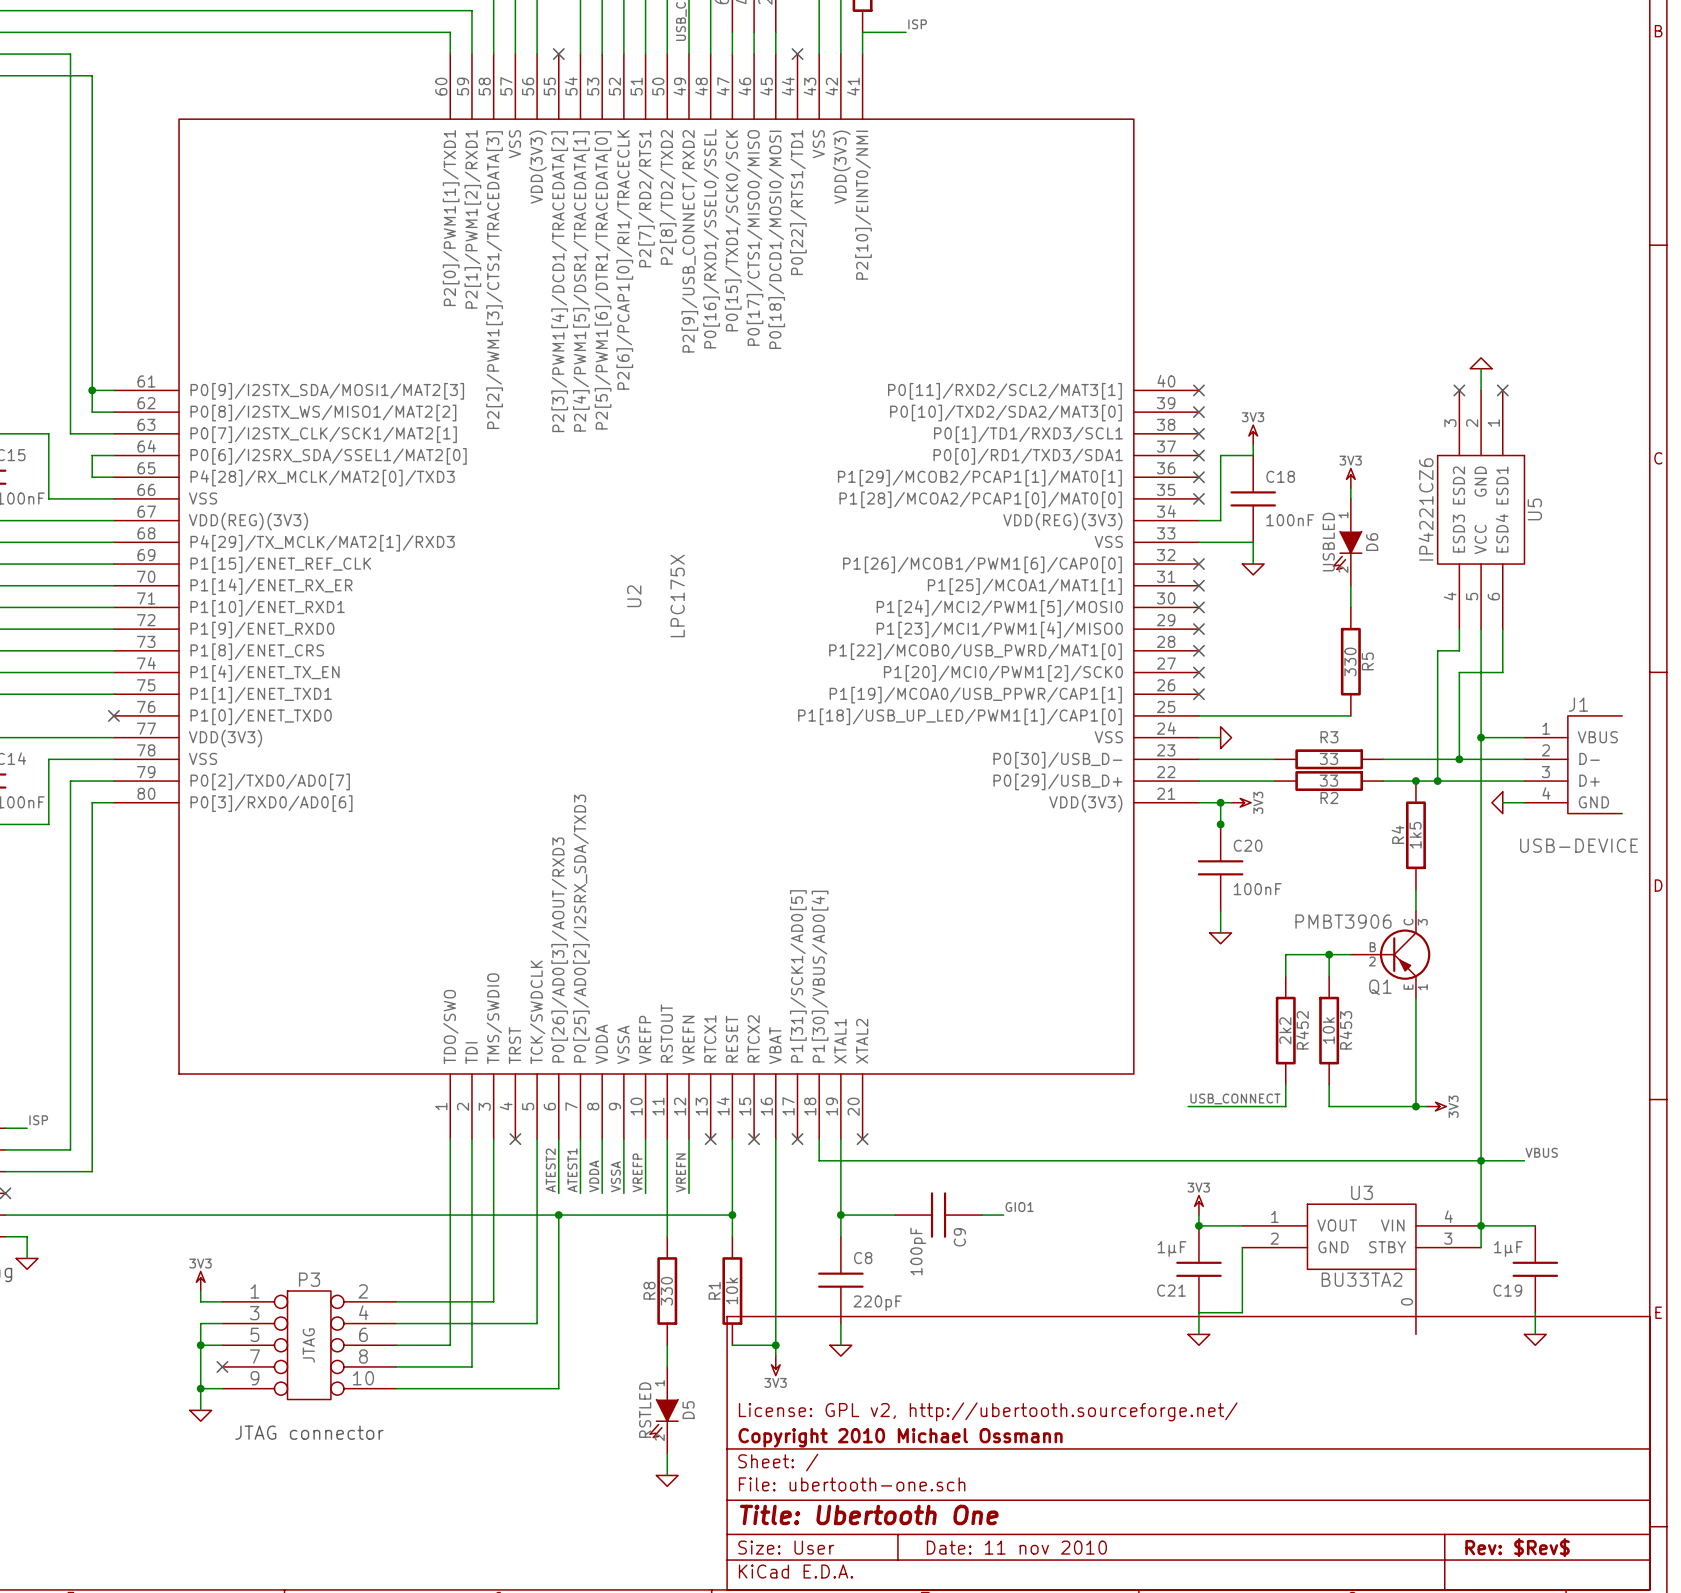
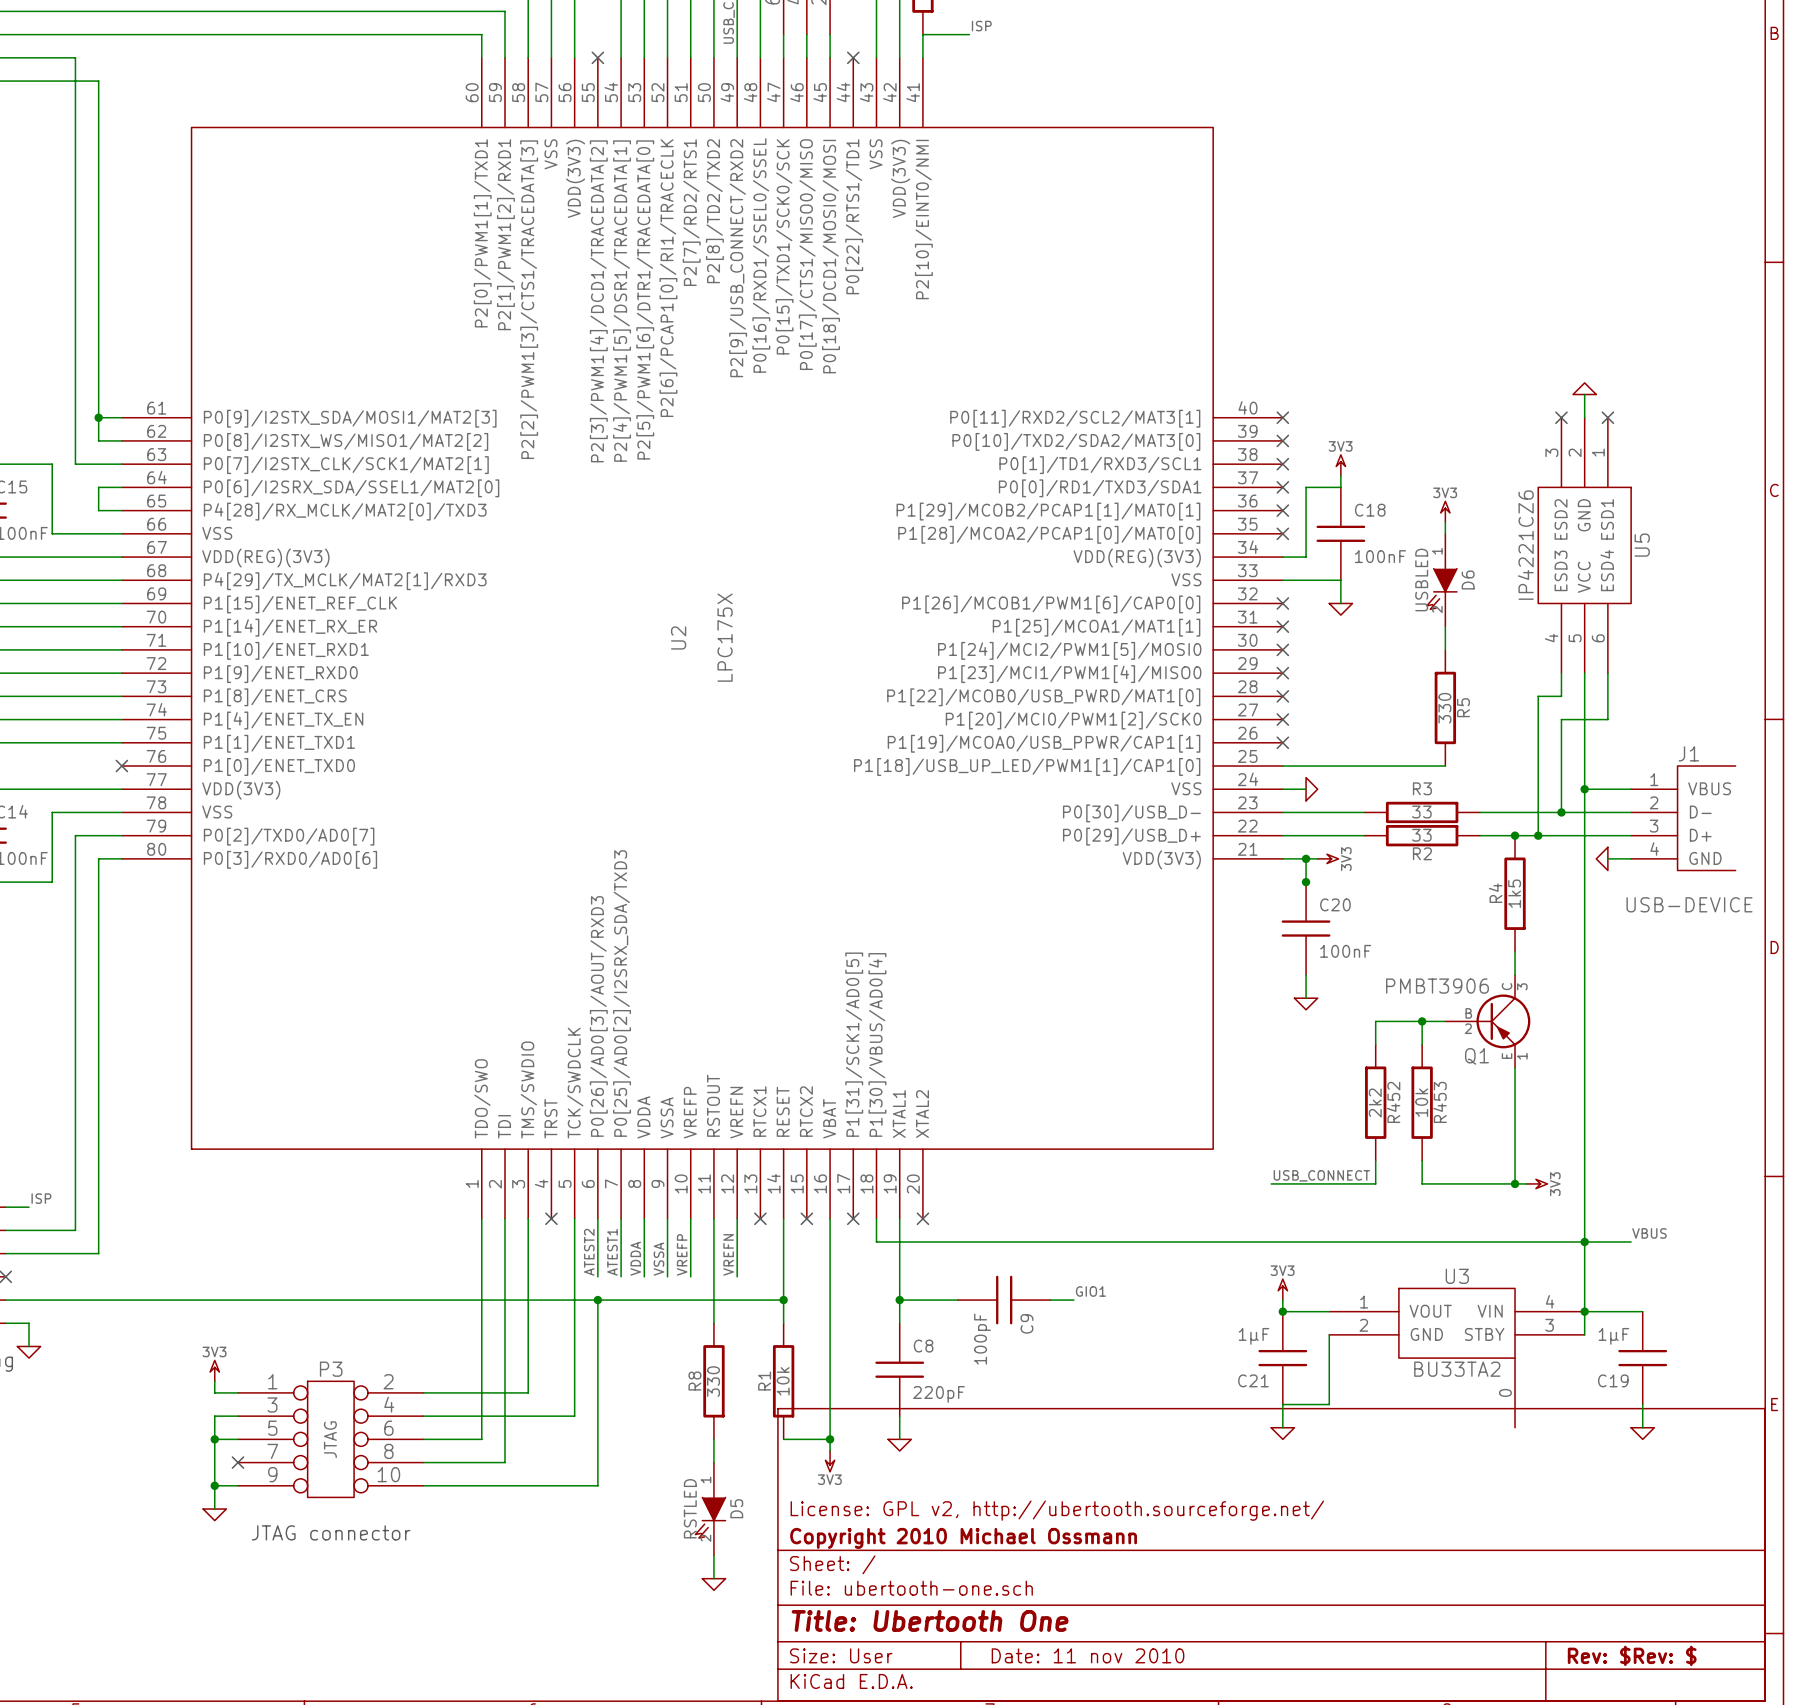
title block: Rev: $Rev$ (1517, 1547) -> Rev: $Rev: $ (1632, 1655)

